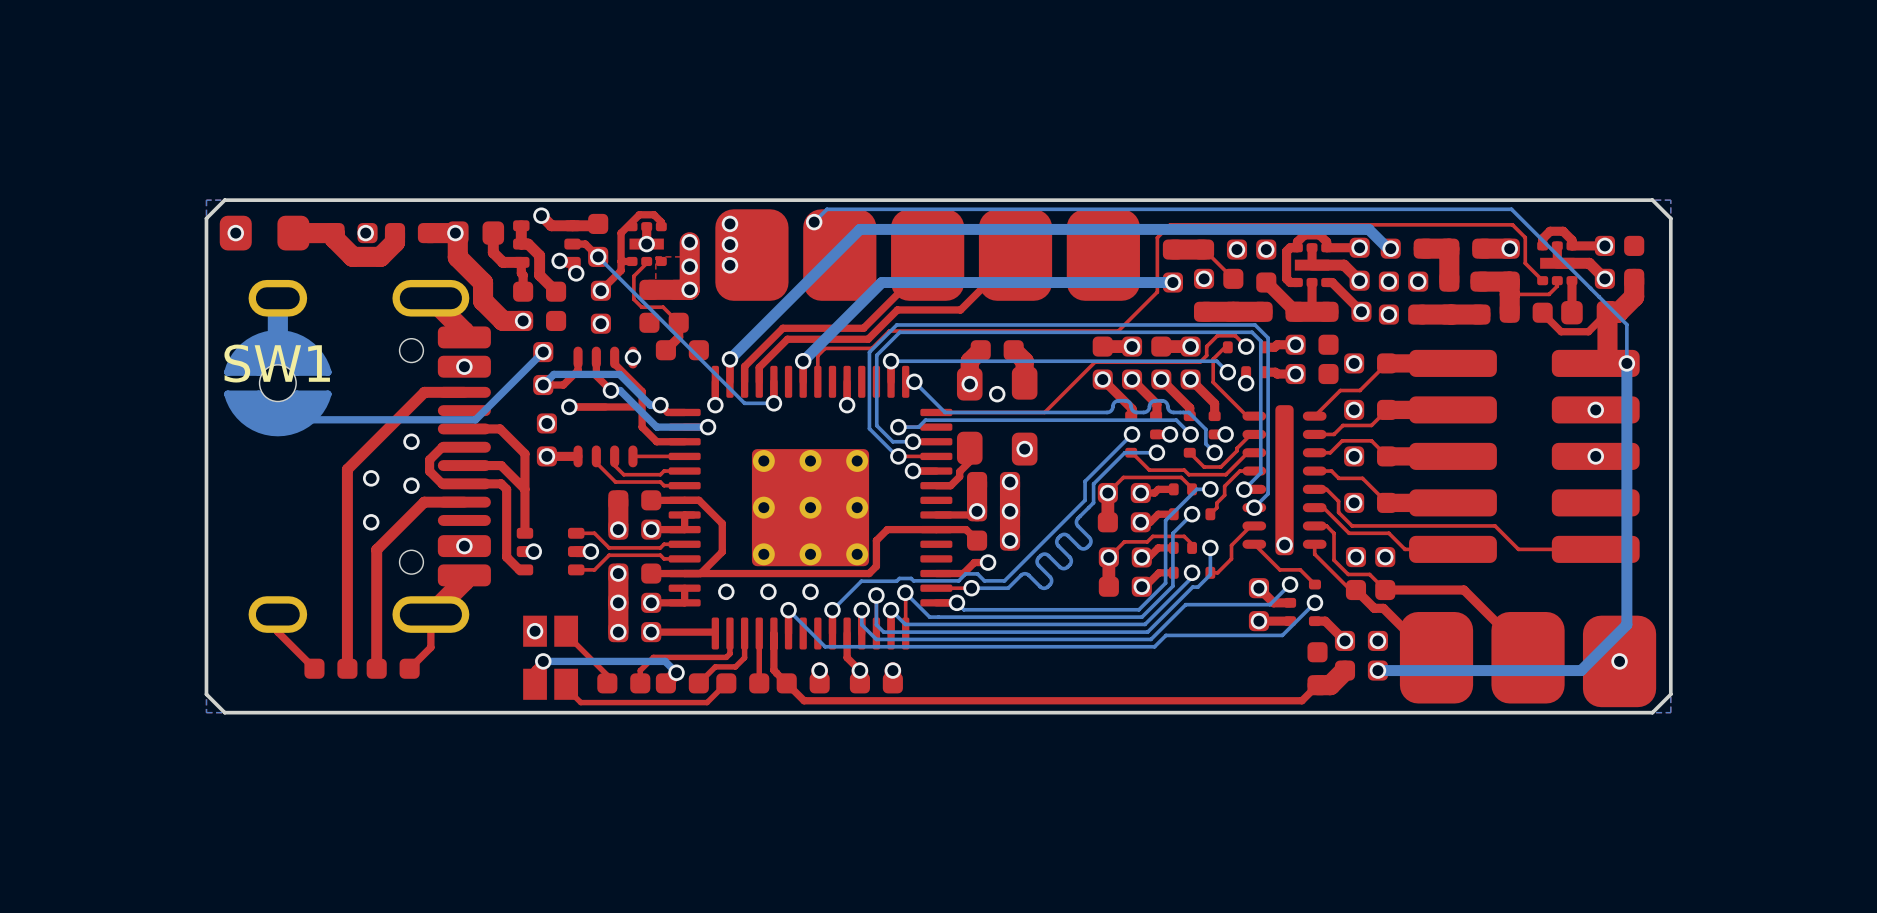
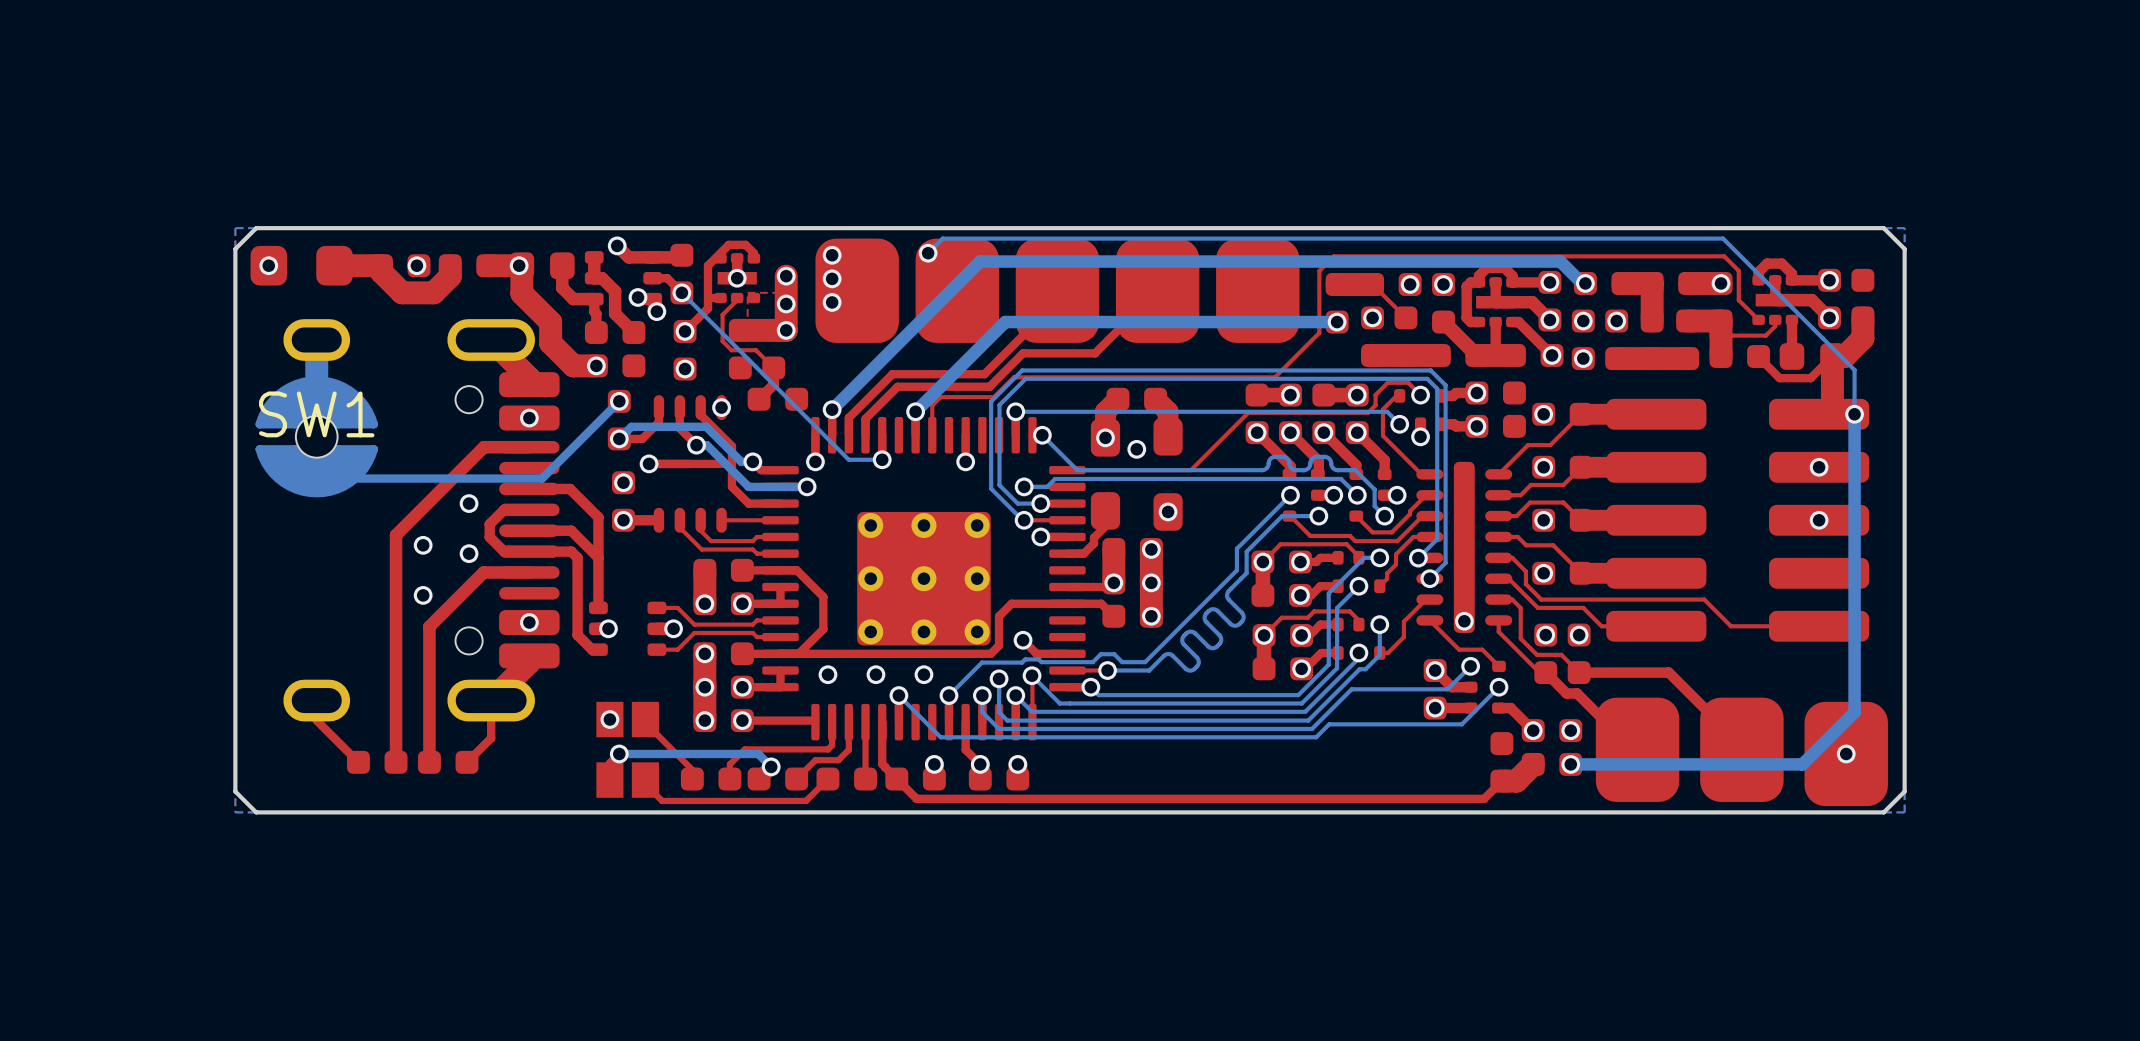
top track: (988, 562) (974, 562) (963, 573) (936, 573) -> (1023, 640) (1036, 653) (1067, 653)
via position: (988, 562) -> (1023, 640)

